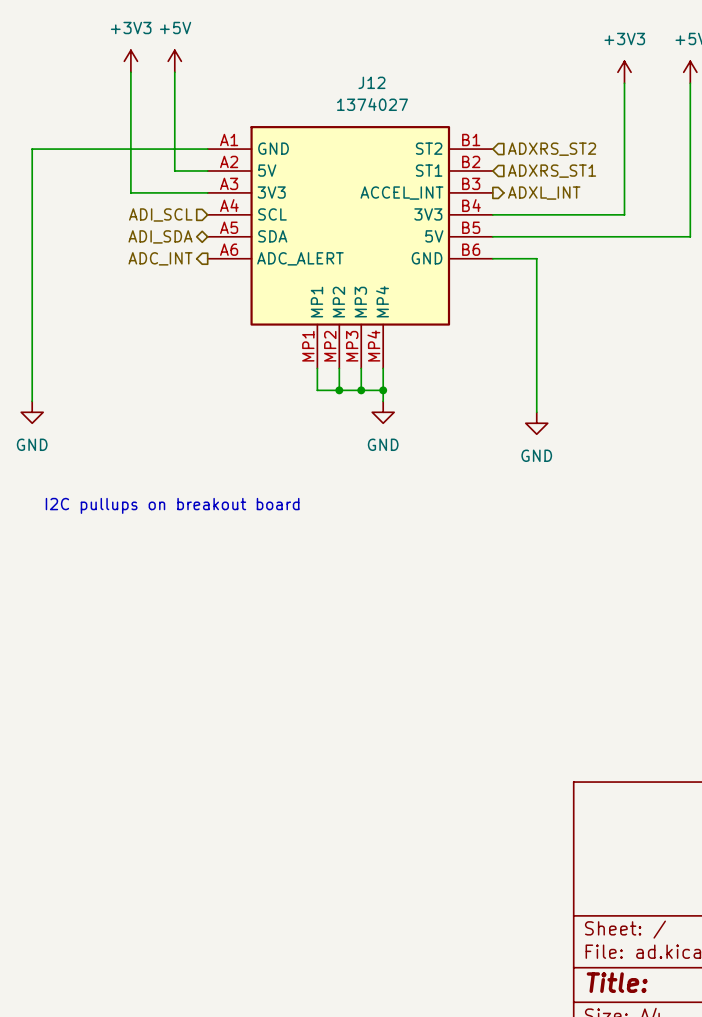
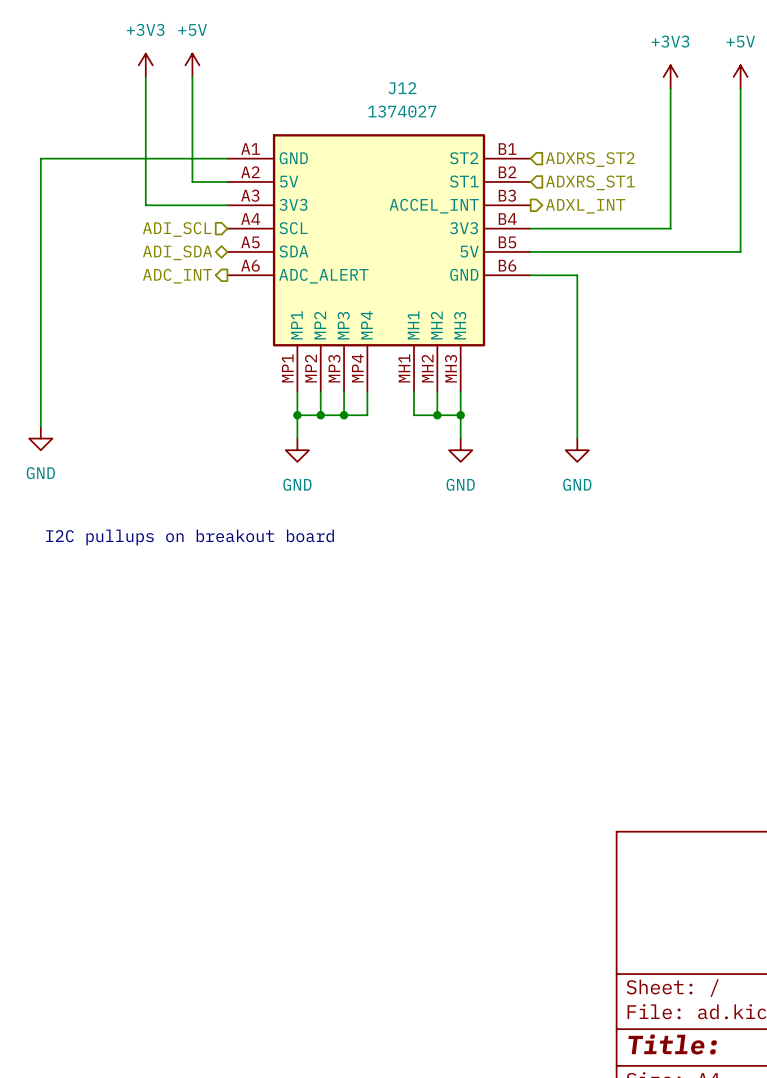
J12 symbol: [207, 126, 493, 369] -> [227, 134, 531, 392]
wire: none -> (297, 391) (297, 438)
wire: none -> (320, 391) (320, 415)
wire: (361, 368) (361, 390) -> (437, 391) (437, 415)
wire: none -> (460, 391) (460, 438)
wire: none -> (297, 415) (344, 415)
junction: none -> (297, 415)
junction: none -> (320, 415)
junction: none -> (344, 415)
wire: (339, 390) (383, 390) (383, 401) -> none
junction: (339, 390) -> none
junction: (361, 390) -> none
wire: none -> (414, 415) (460, 415)
junction: (383, 390) -> none
junction: none -> (437, 415)
junction: none -> (460, 415)
power symbol position: GND (383, 412) -> GND (460, 450)
power symbol: none -> GND (297, 450)

